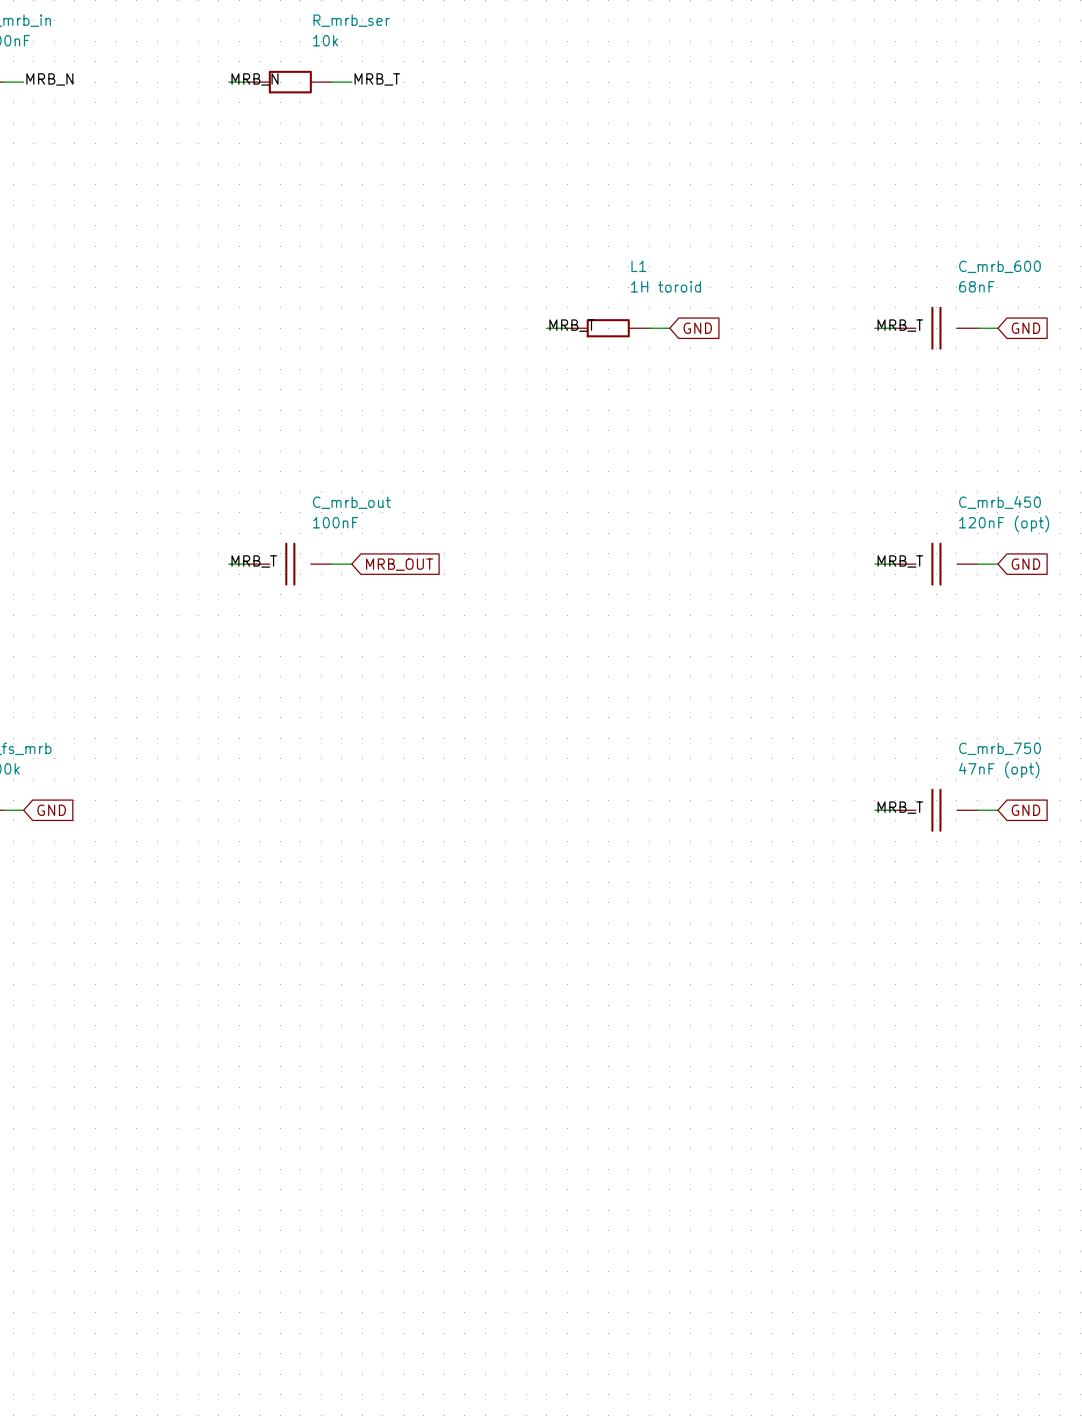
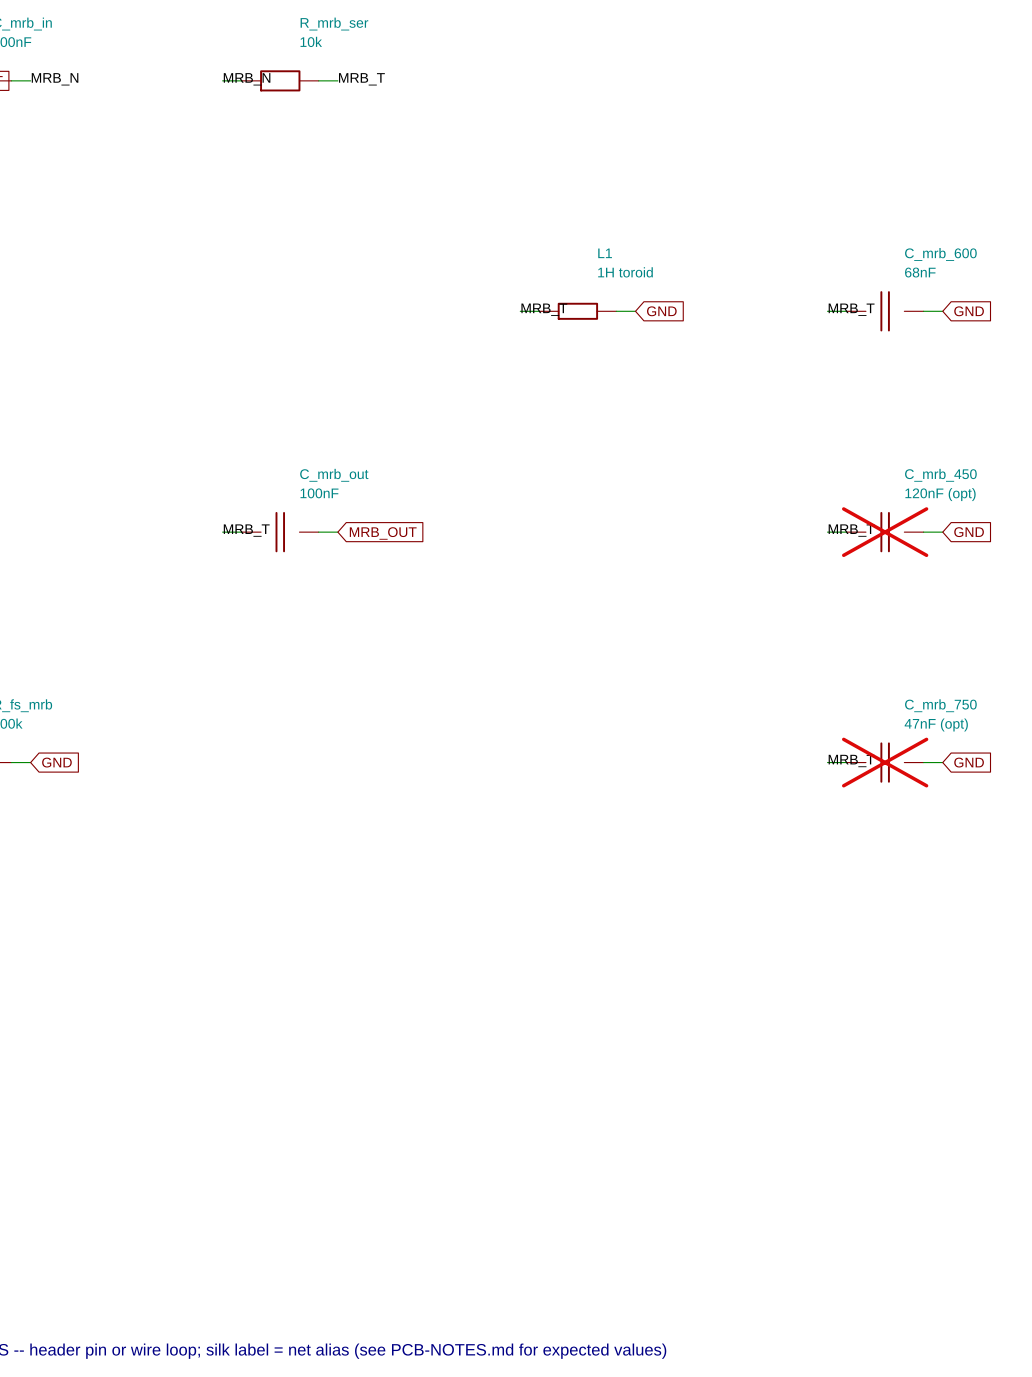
C_mrb_450 do-not-place cross: none -> (885, 532)
C_mrb_750 do-not-place cross: none -> (885, 762)

